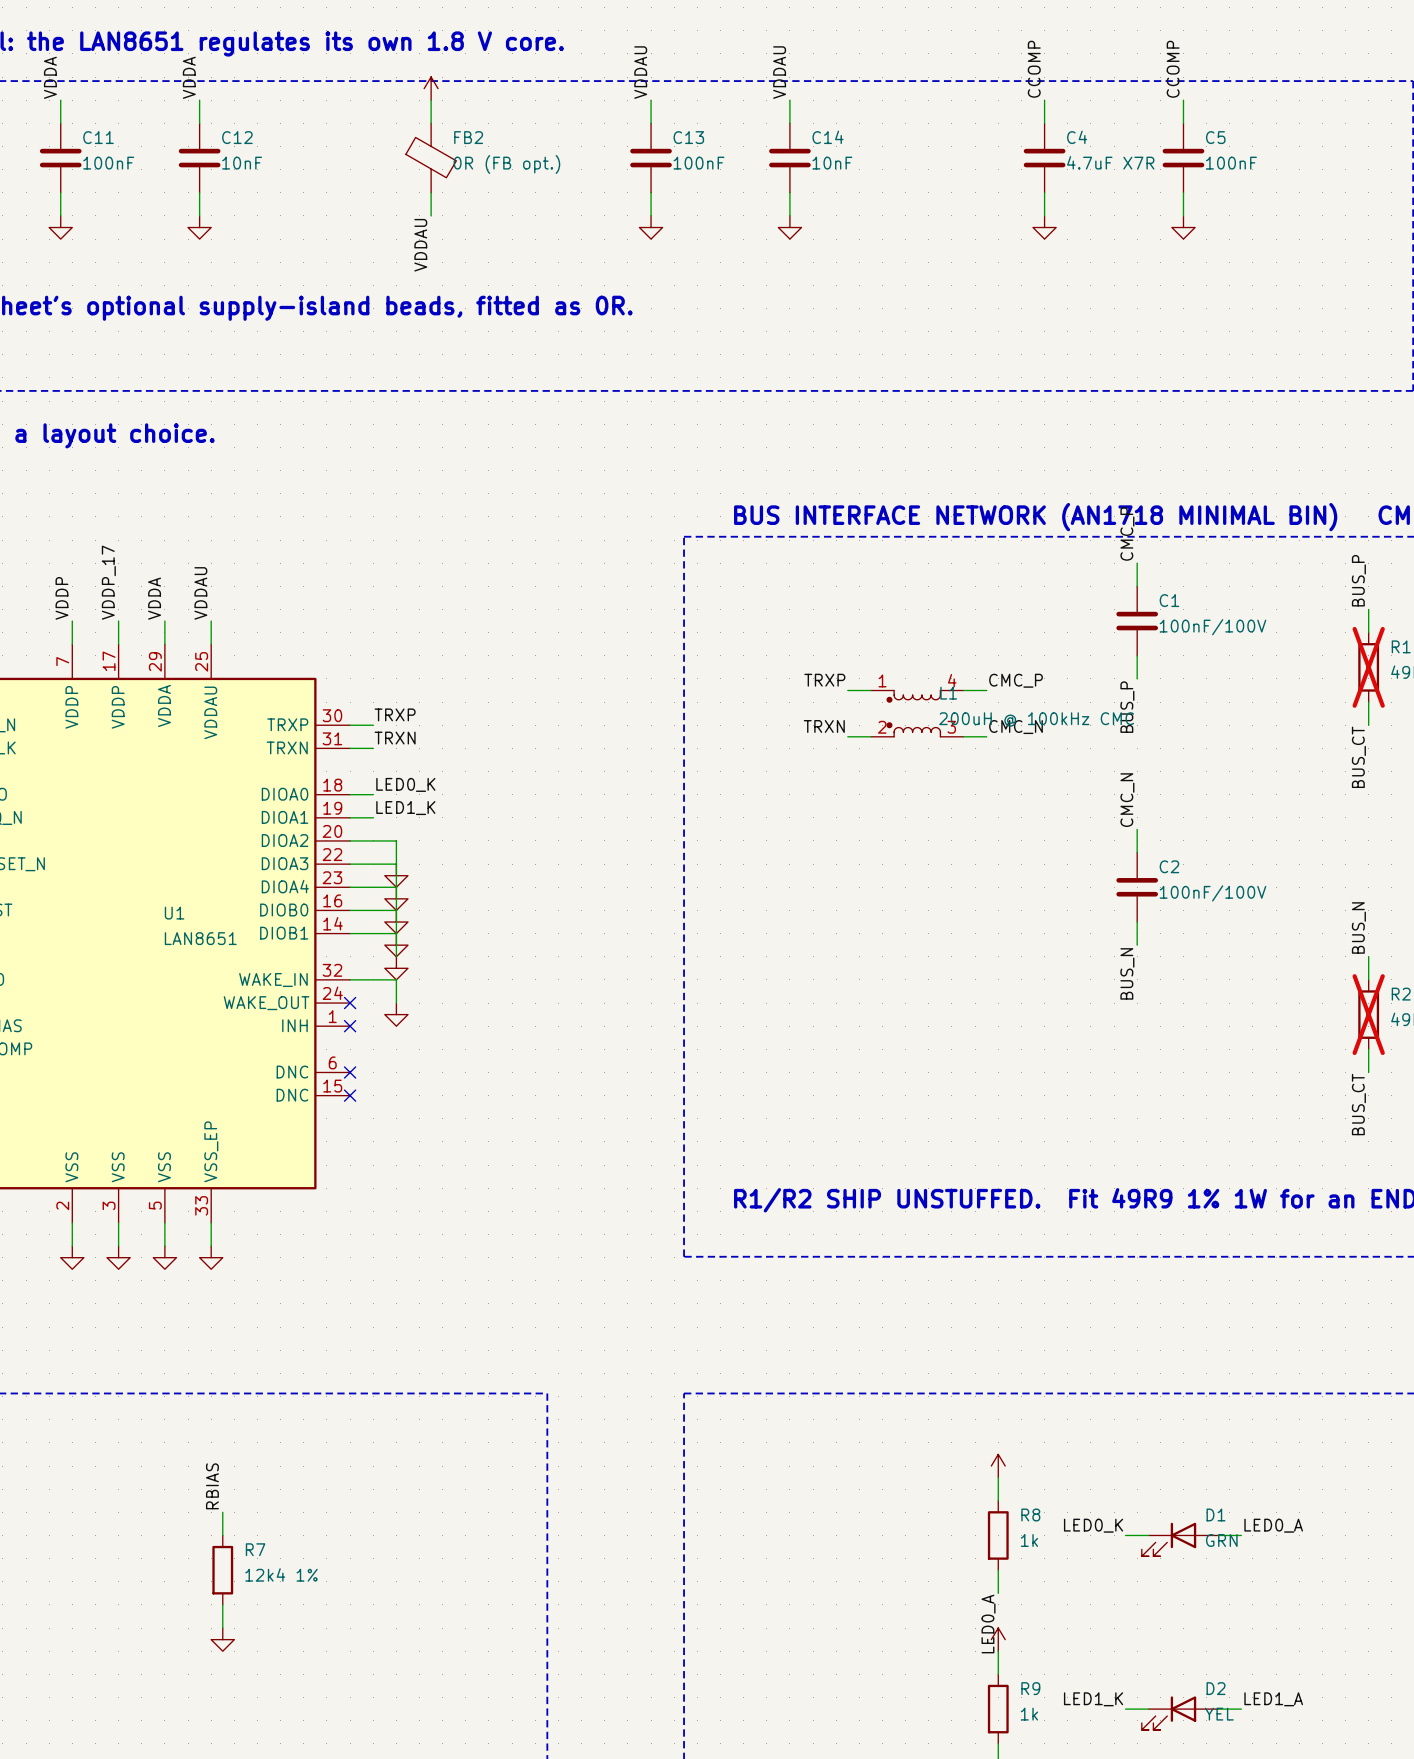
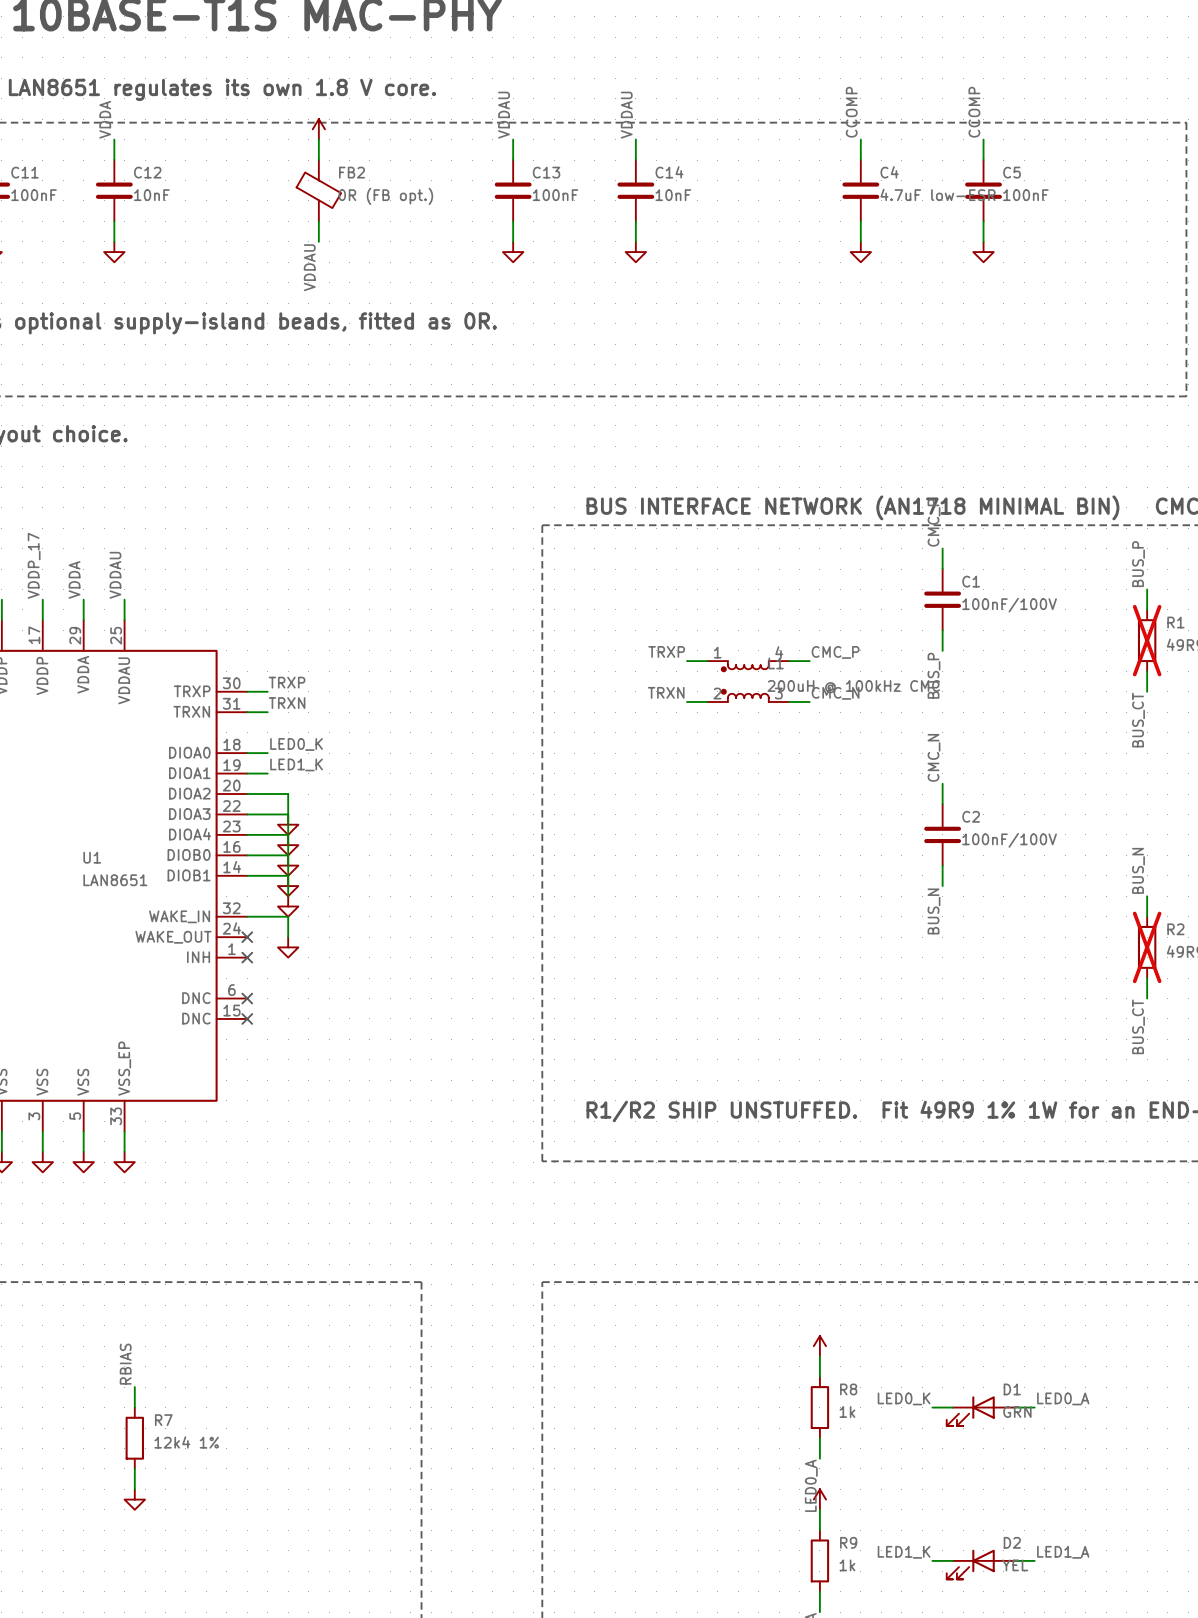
C4 value: 4.7uF X7R (1110, 162) -> 4.7uF low-ESR (938, 194)

